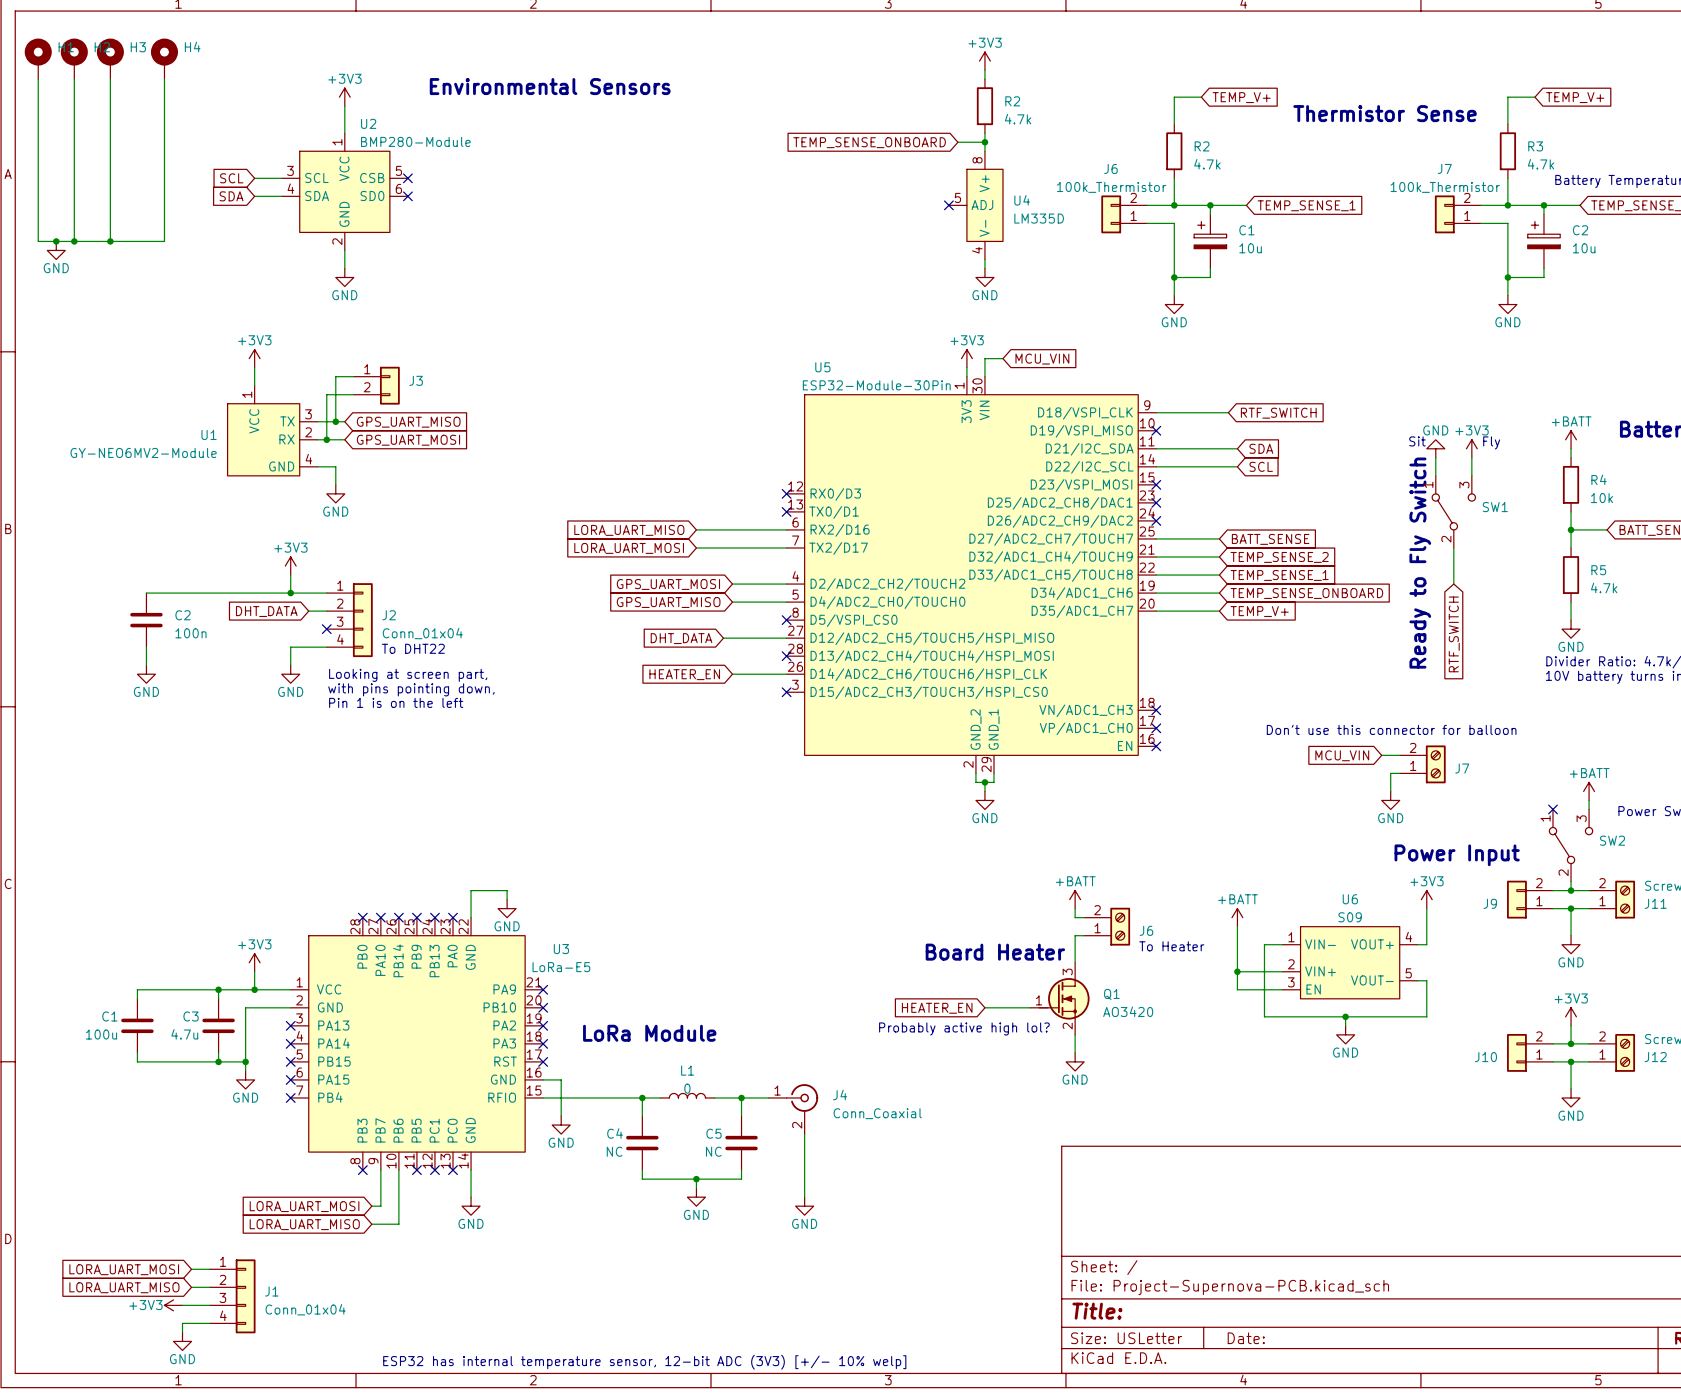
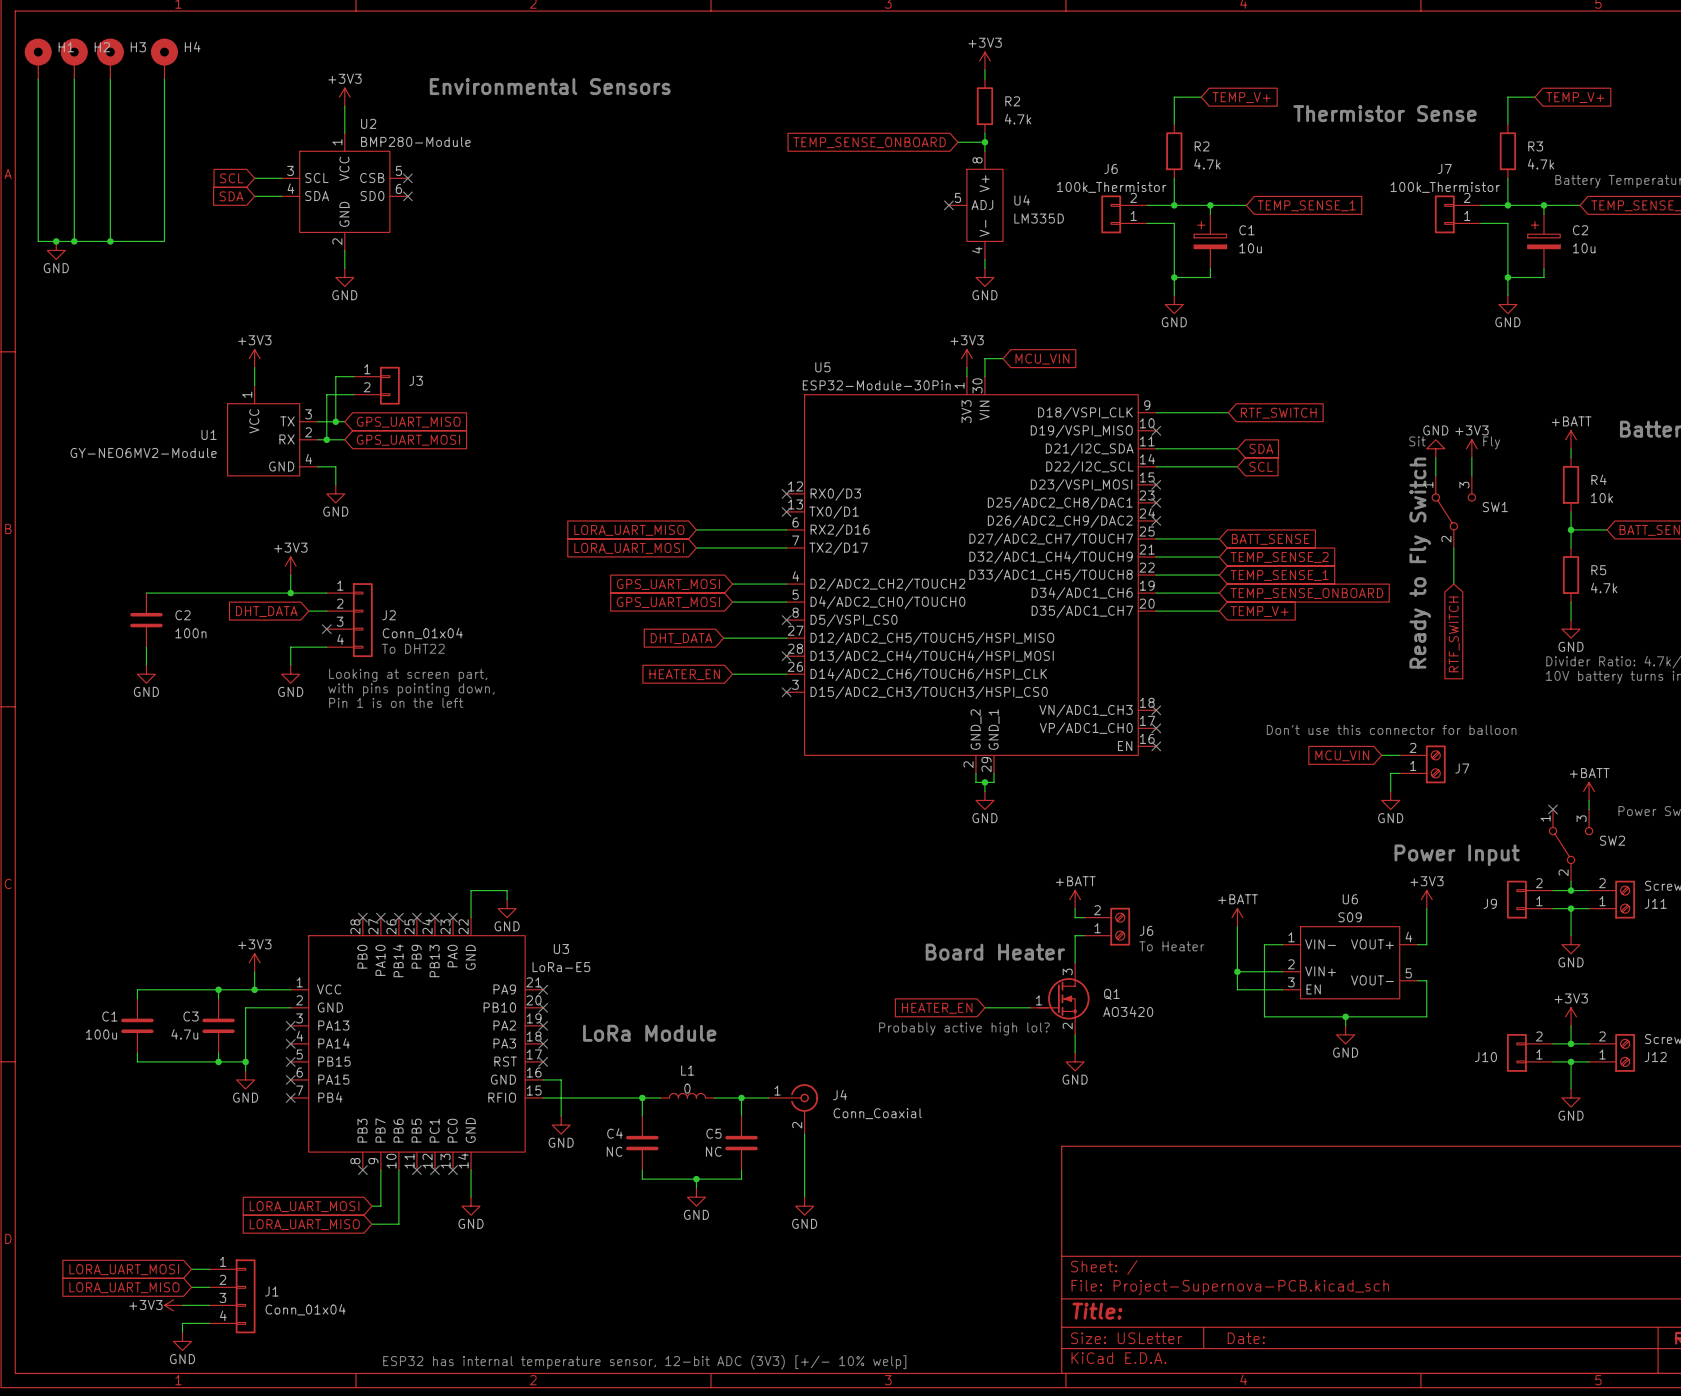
global label: GPS_UART_MISO (668, 602) -> GPS_UART_MOSI (668, 602)

